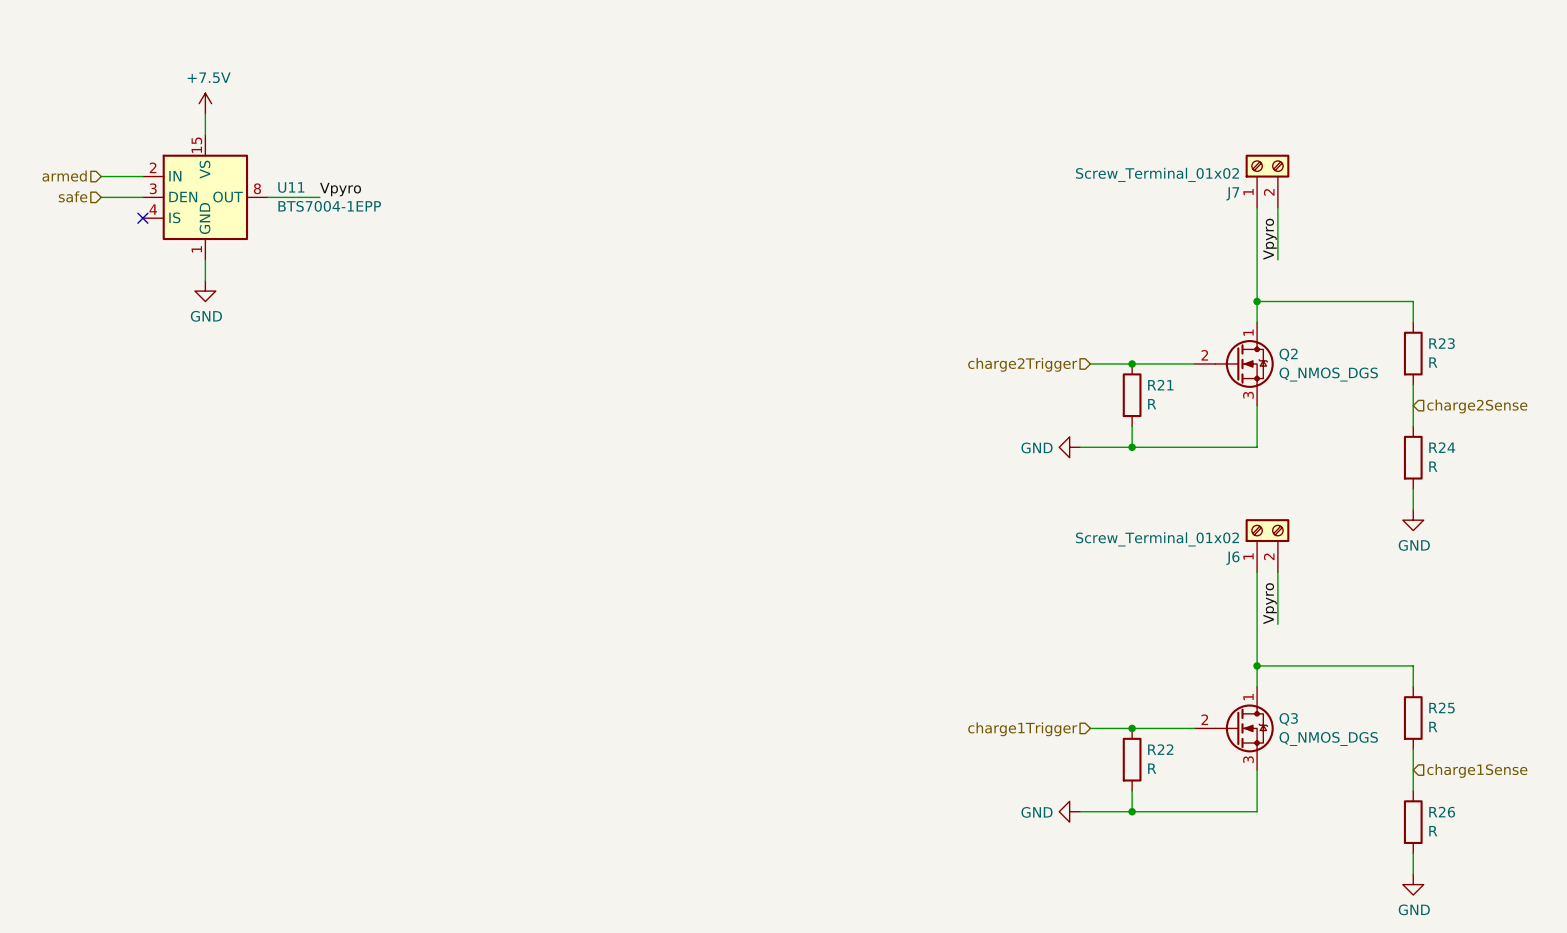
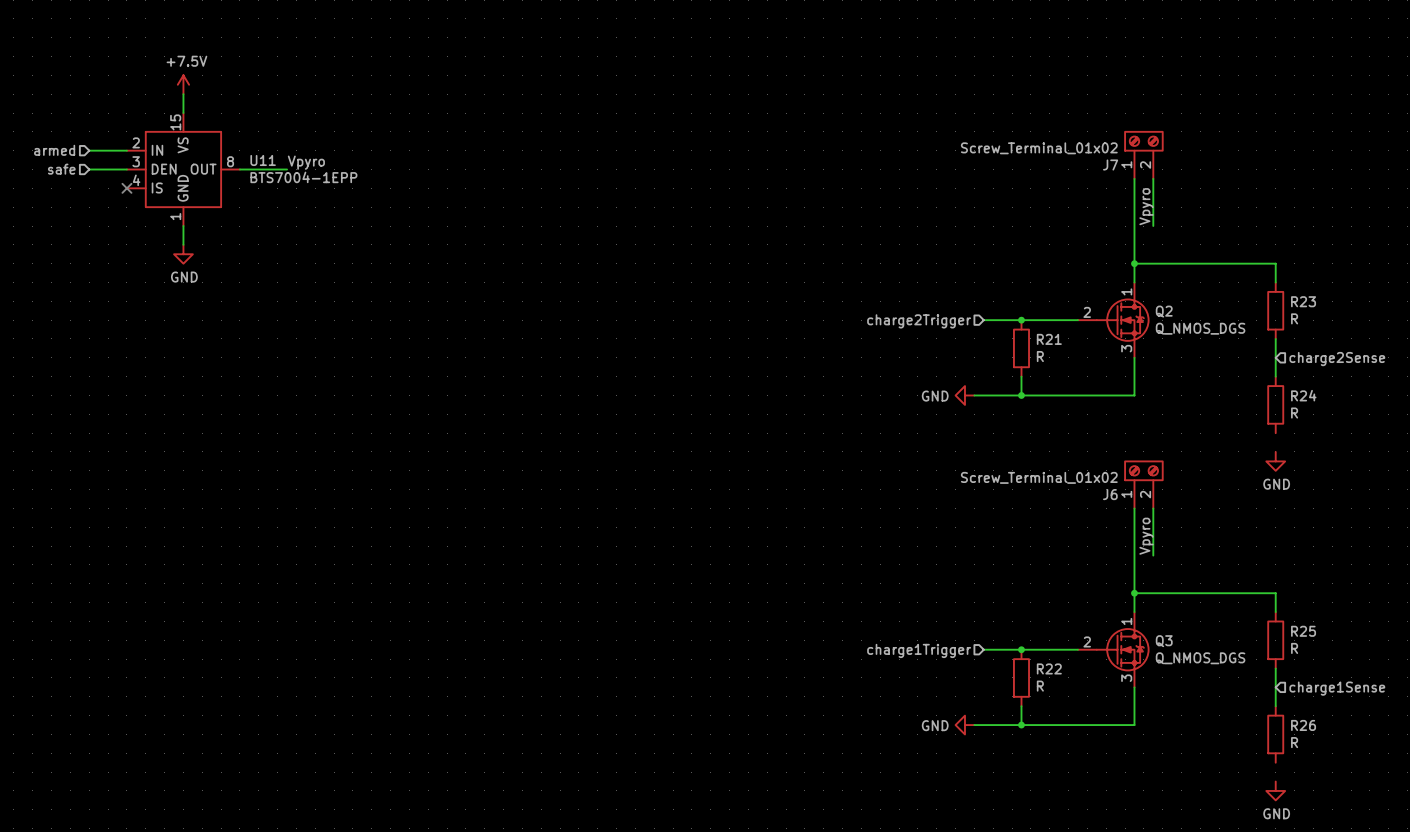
wire: (1413, 488) (1413, 509) -> none
wire: (1413, 853) (1413, 874) -> none

